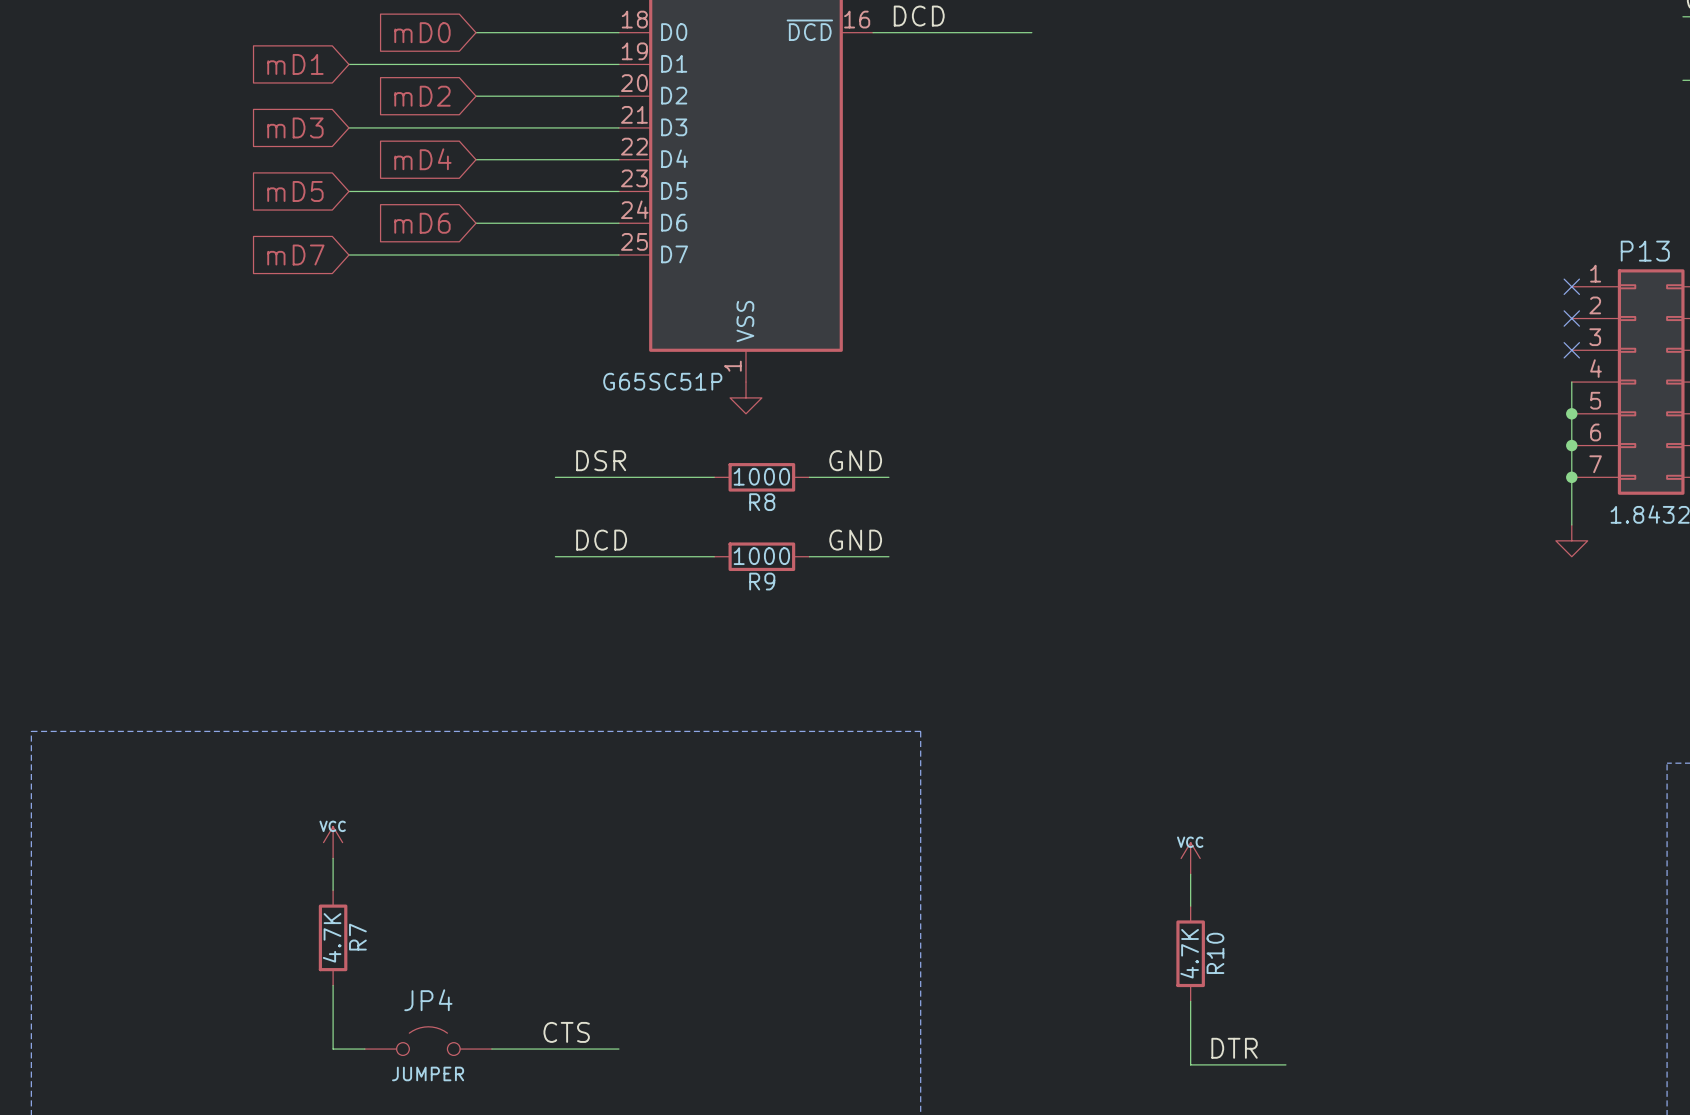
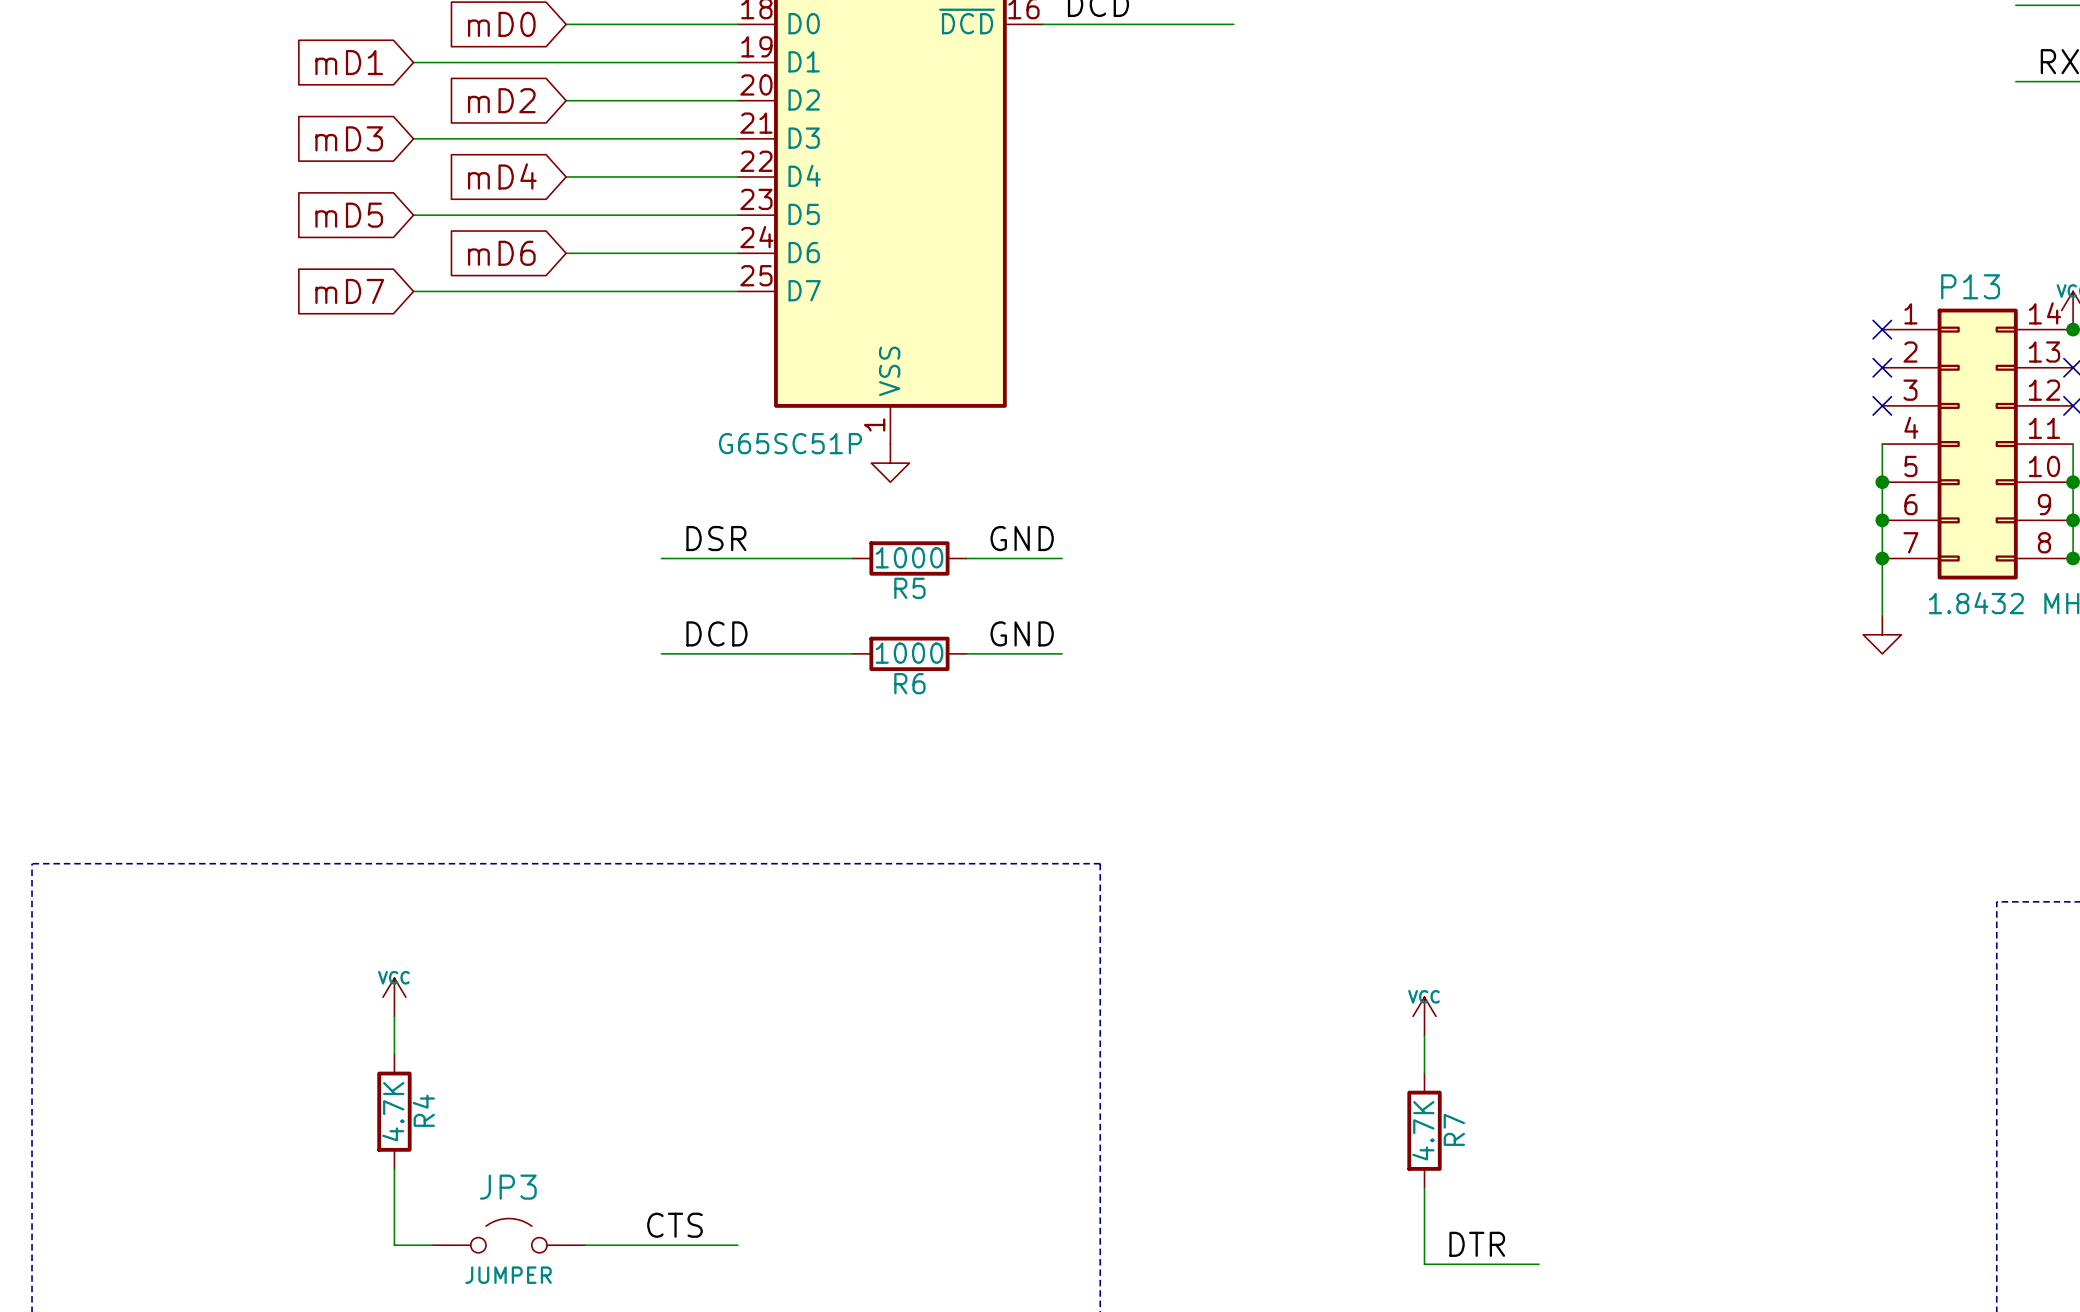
R8 name: R8 (762, 502) -> R5 (909, 588)
R9 name: R9 (762, 581) -> R6 (909, 683)
R7 name: R7 (357, 937) -> R4 (423, 1110)
R10 name: R10 (1215, 953) -> R7 (1454, 1129)
JP4 name: JP4 (428, 1000) -> JP3 (508, 1187)

